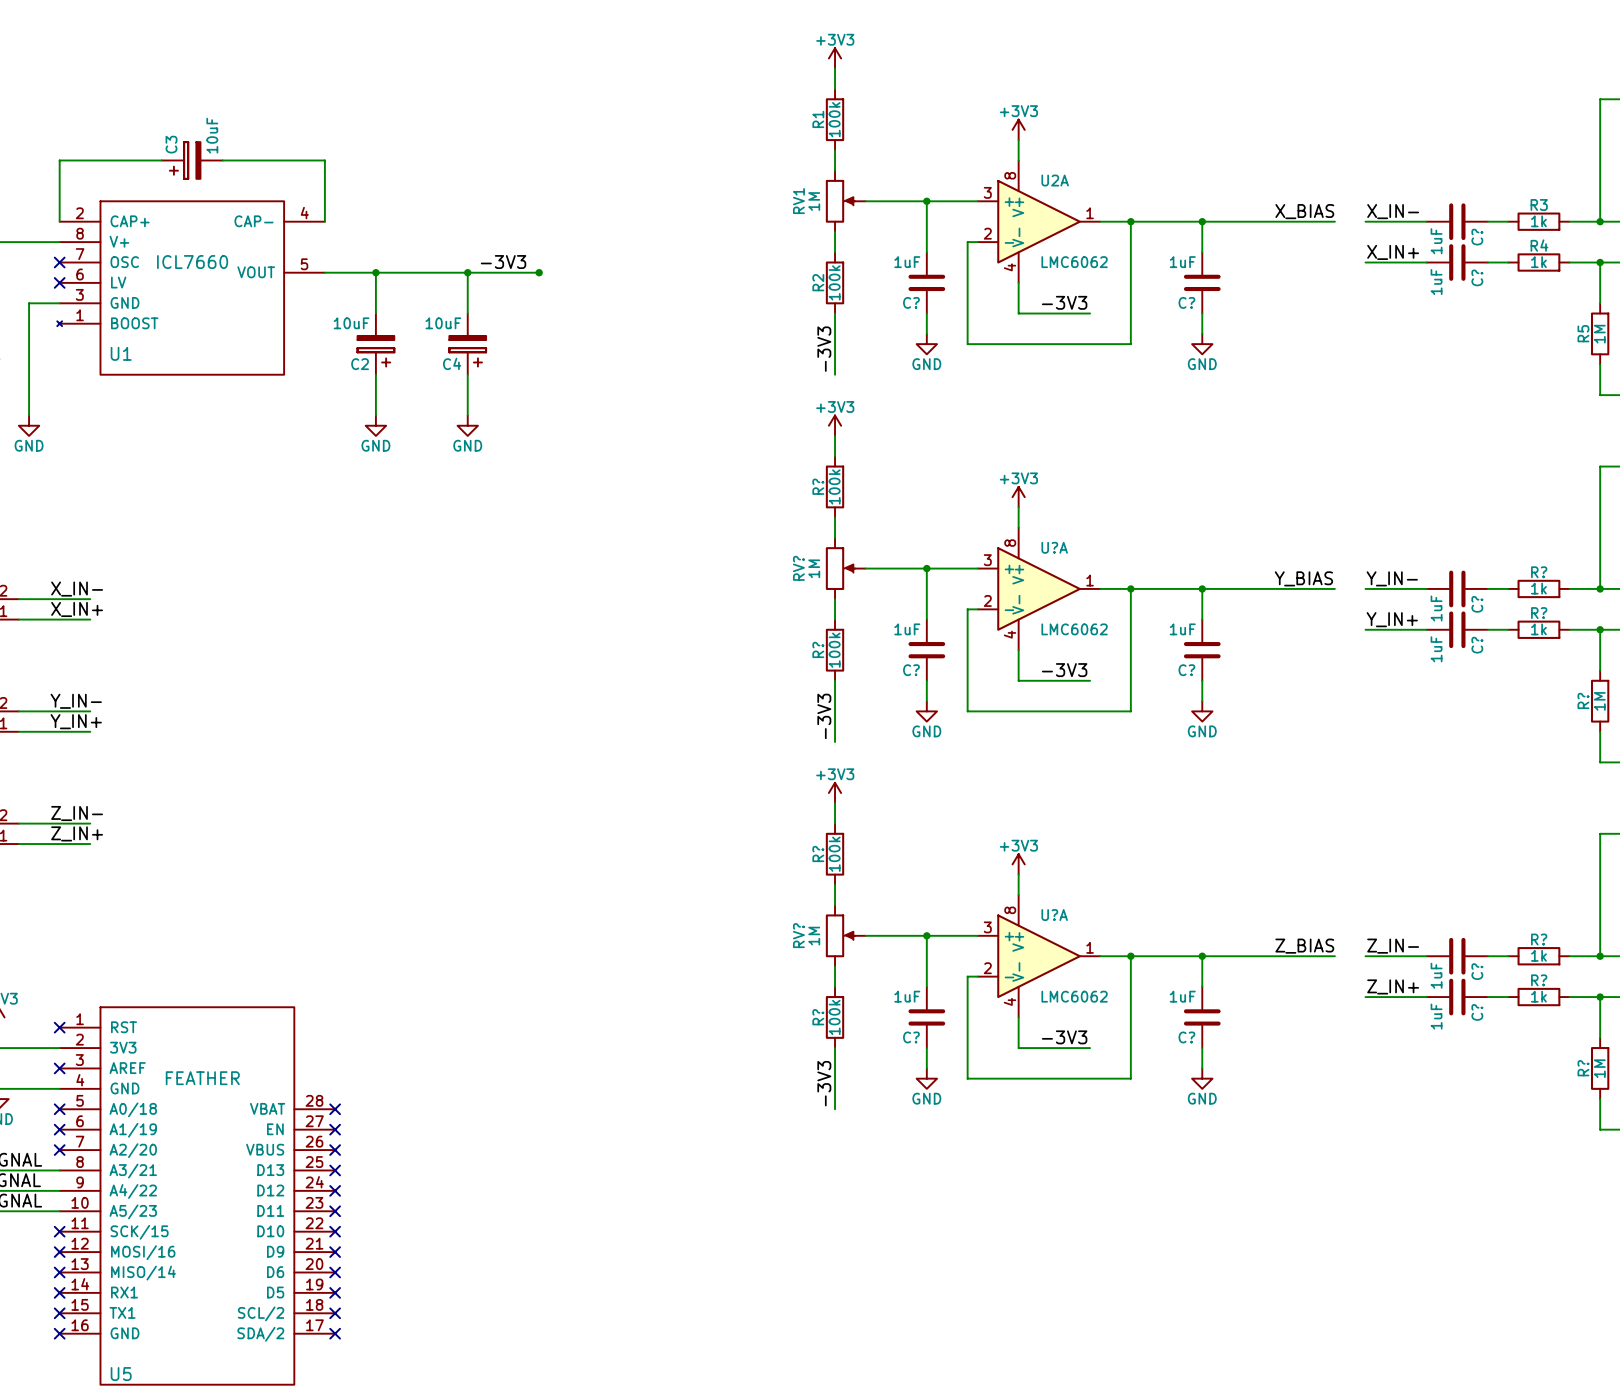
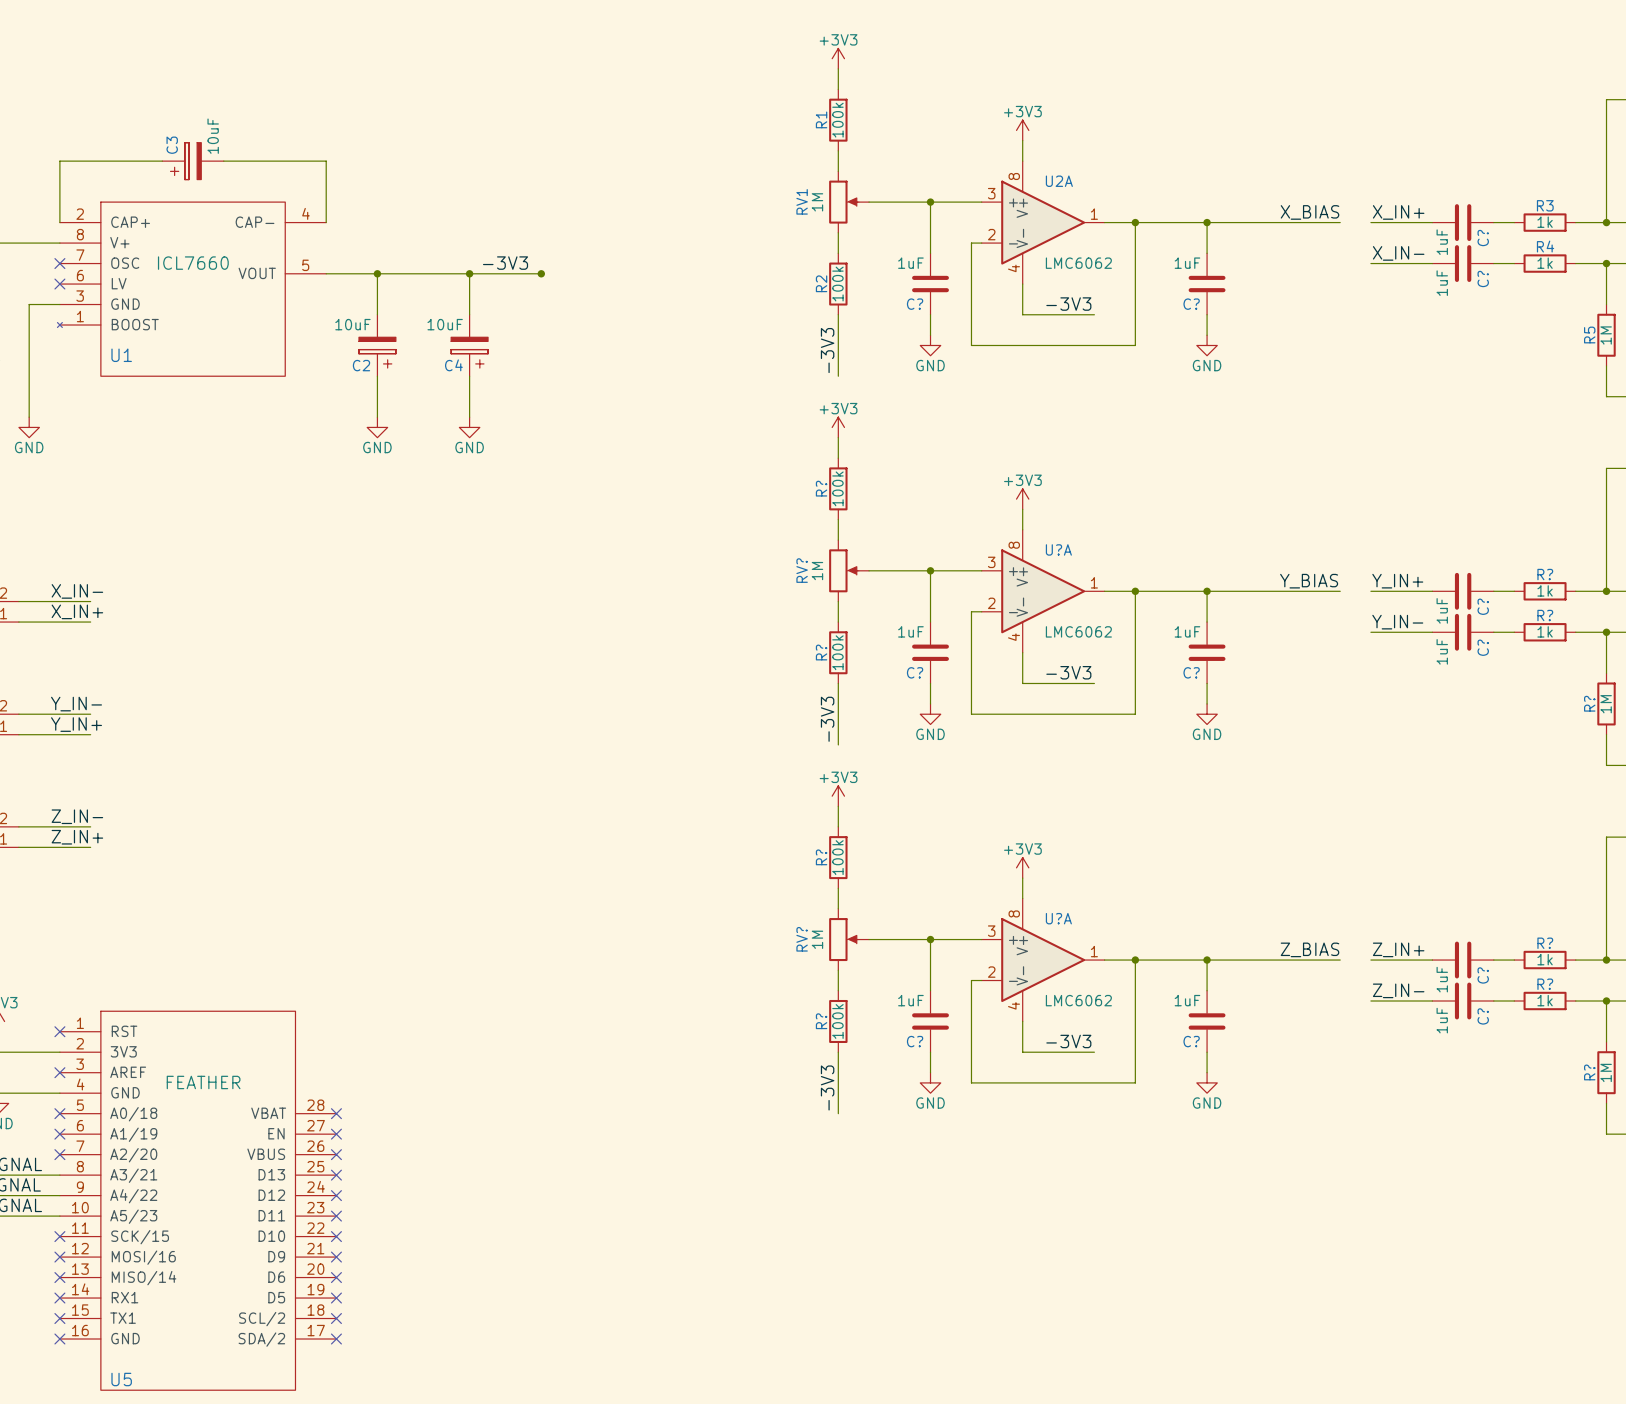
label: X_IN- (1393, 211) -> X_IN+ (1398, 212)
label: X_IN+ (1393, 252) -> X_IN- (1398, 253)
label: Y_IN- (1392, 578) -> Y_IN+ (1397, 581)
label: Y_IN+ (1392, 619) -> Y_IN- (1397, 622)
label: Z_IN- (1393, 946) -> Z_IN+ (1398, 949)
label: Z_IN+ (1393, 986) -> Z_IN- (1398, 990)

